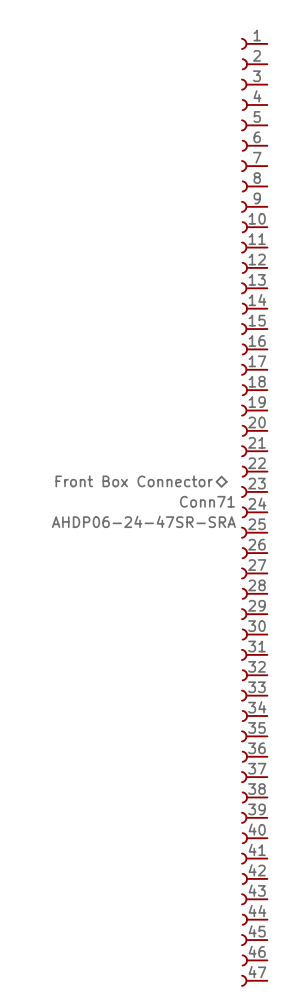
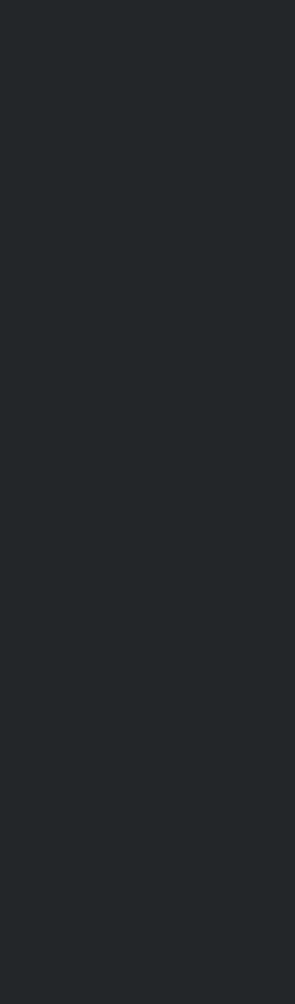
hierarchical label: Front Box Connector (134, 481) -> none
Conn71: (254, 512) -> none

